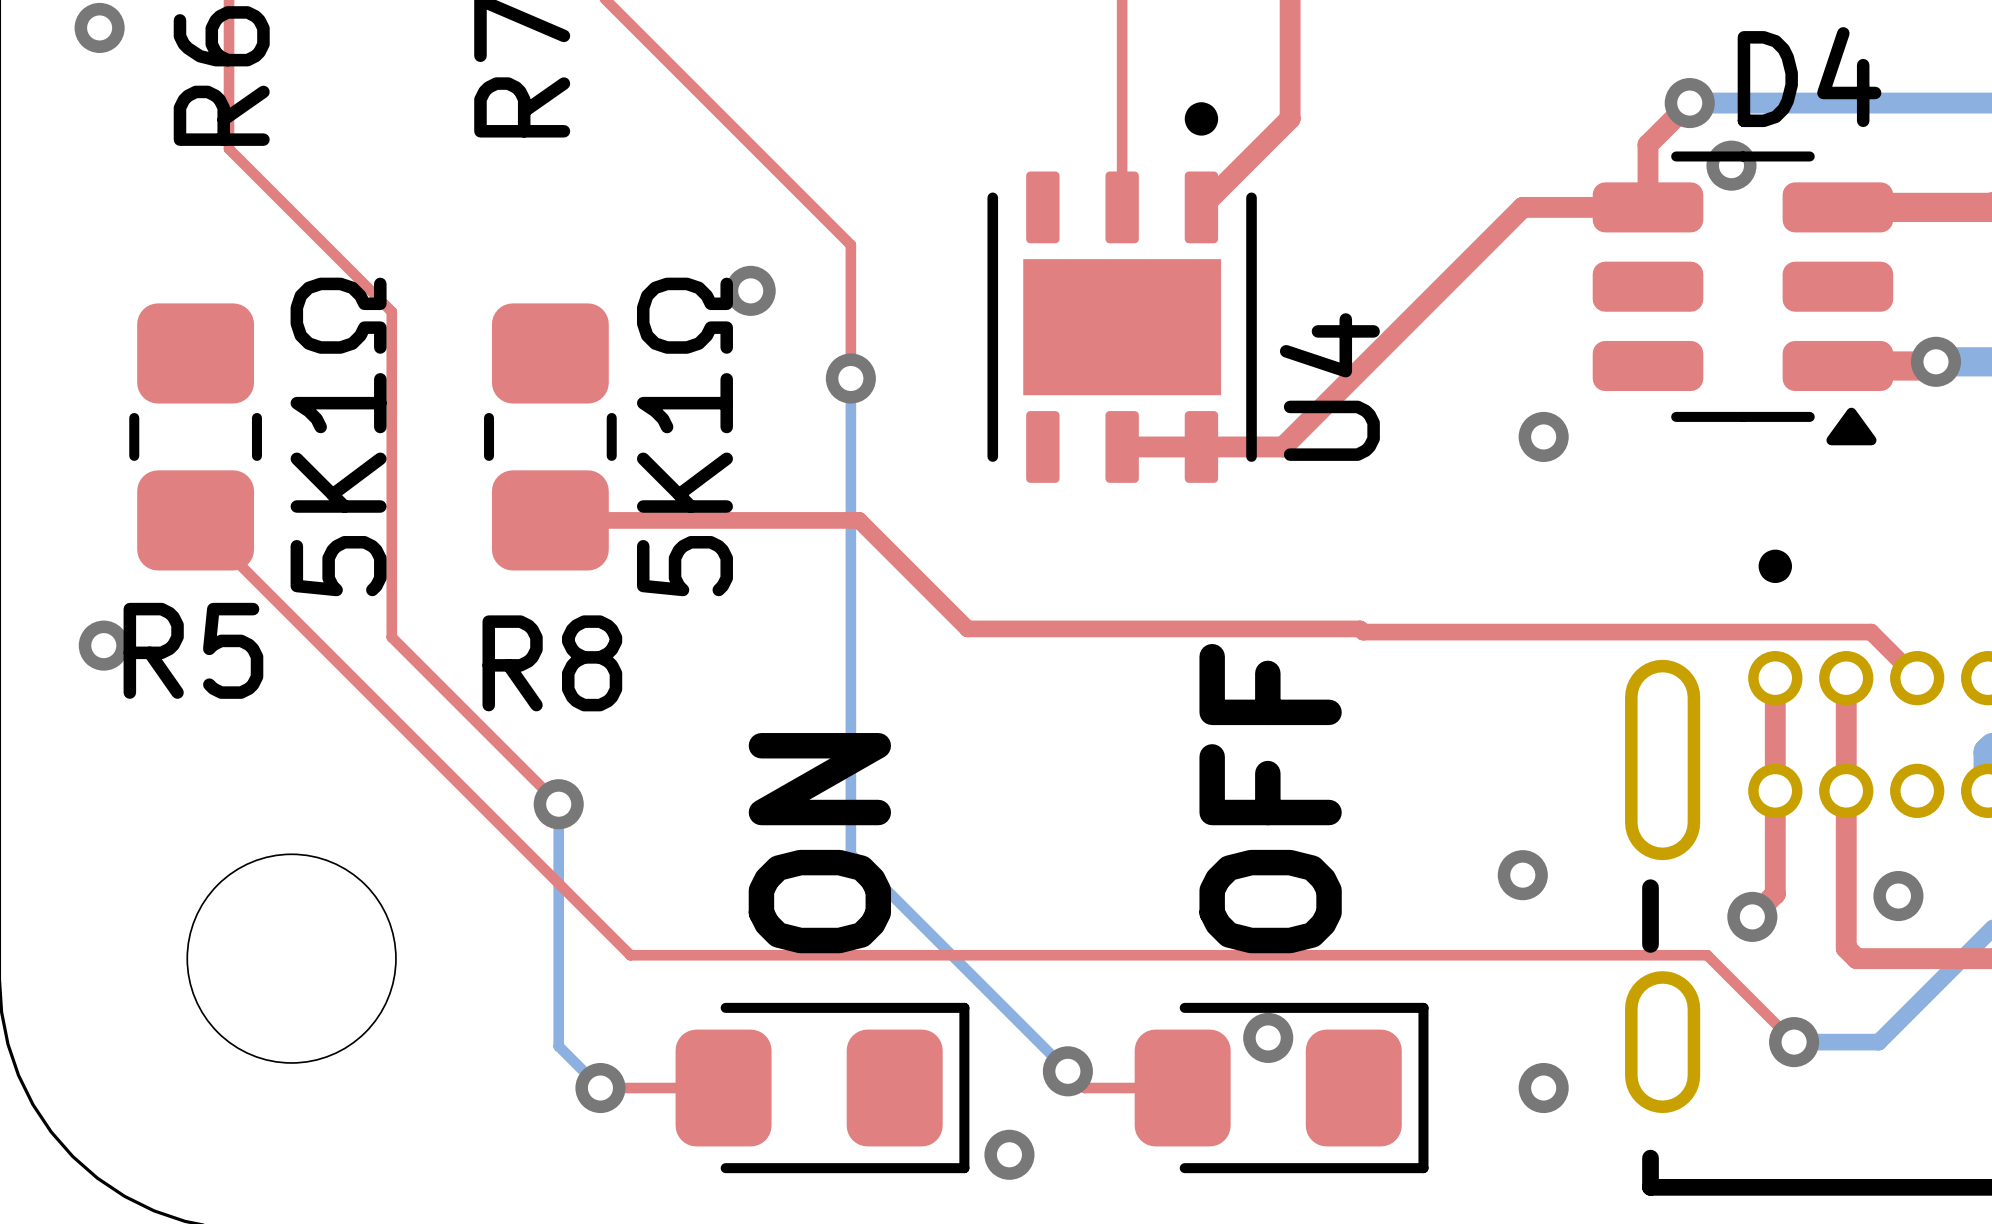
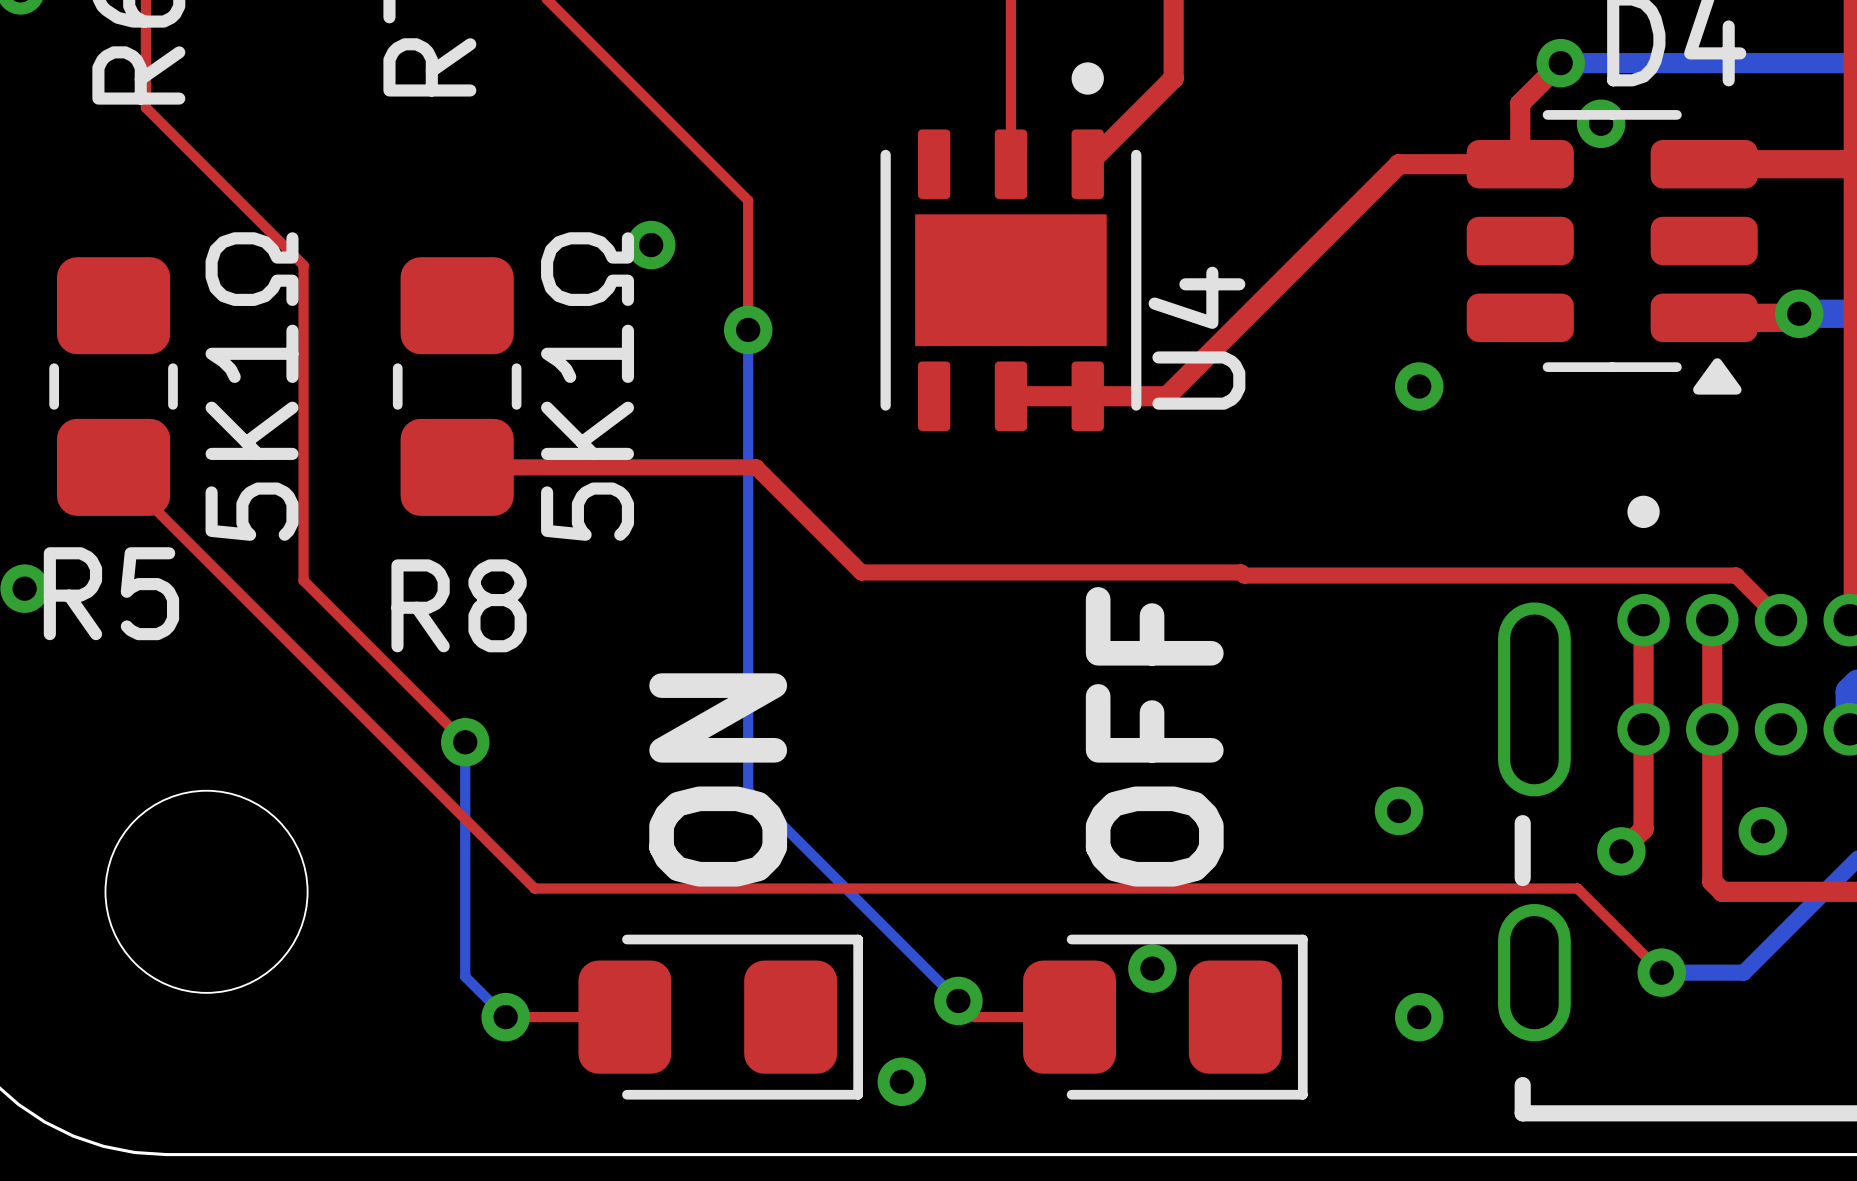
U4 name position: U4 (1329, 387) -> U4 (1196, 338)

